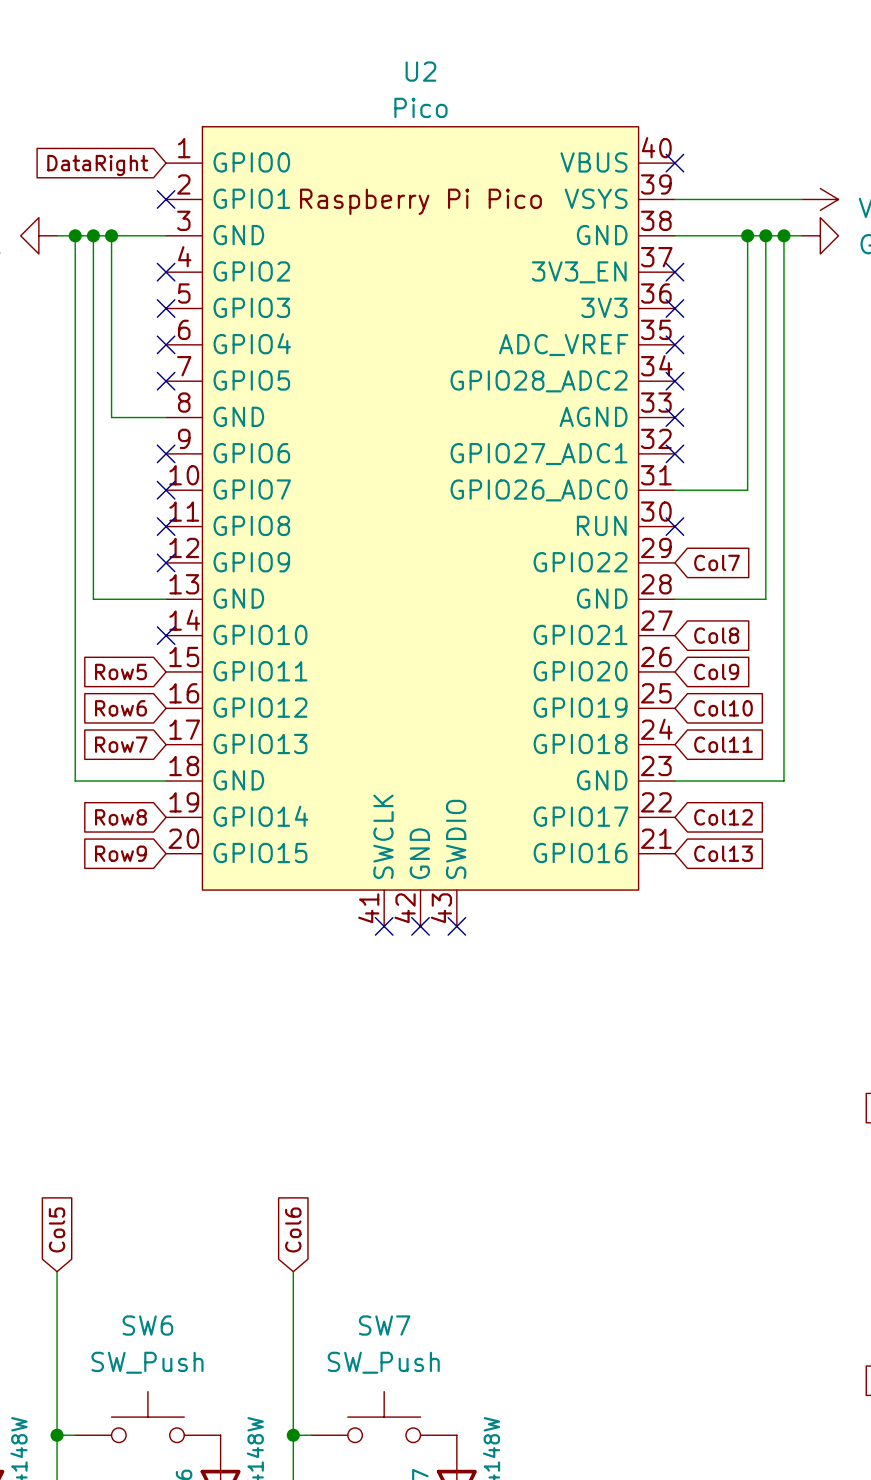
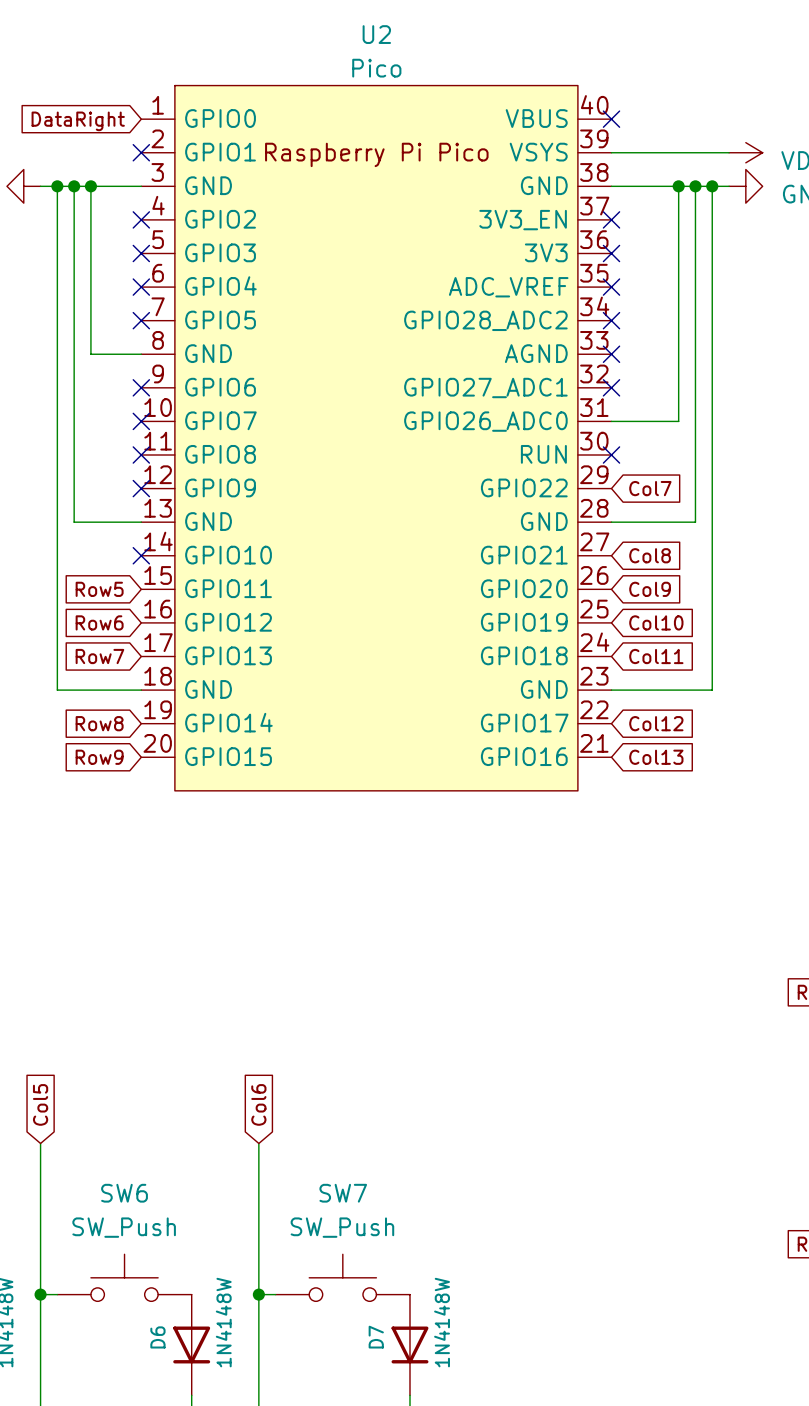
U2 symbol: [166, 126, 675, 927] -> [141, 85, 612, 791]
no-connect mark: (384, 926) -> none
no-connect mark: (420, 926) -> none
no-connect mark: (456, 926) -> none

